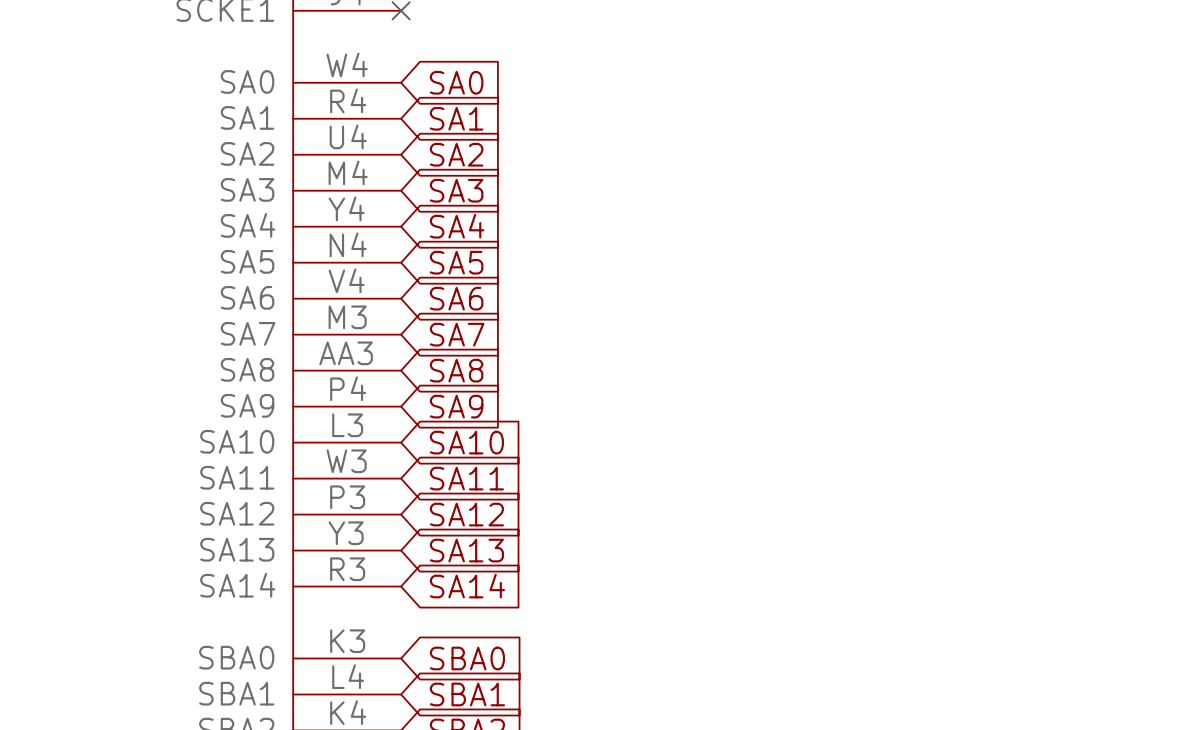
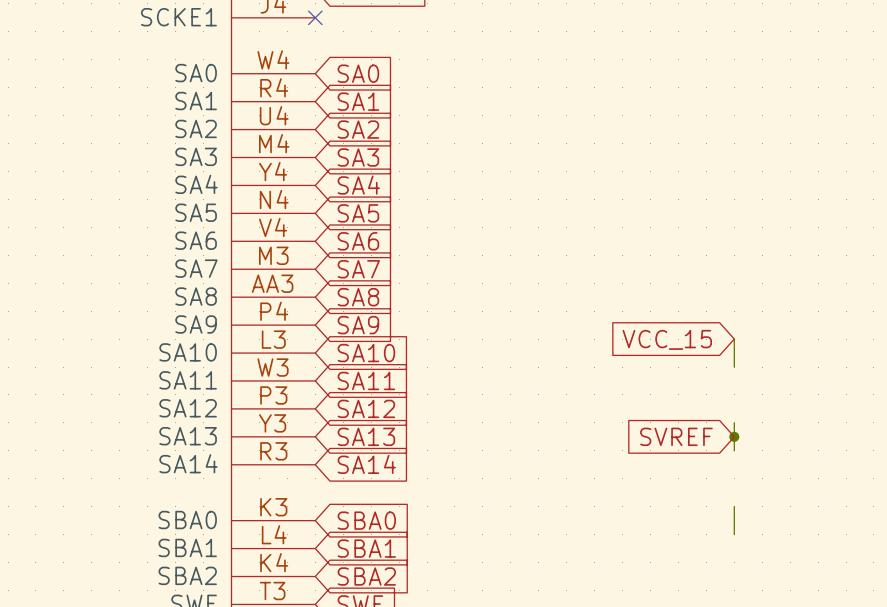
wire: none -> (734, 339) (734, 367)
global label: none -> VCC_15 (667, 339)
wire: none -> (734, 422) (734, 450)
global label: none -> SVREF (676, 436)
junction: none -> (734, 436)
wire: none -> (734, 506) (734, 534)

